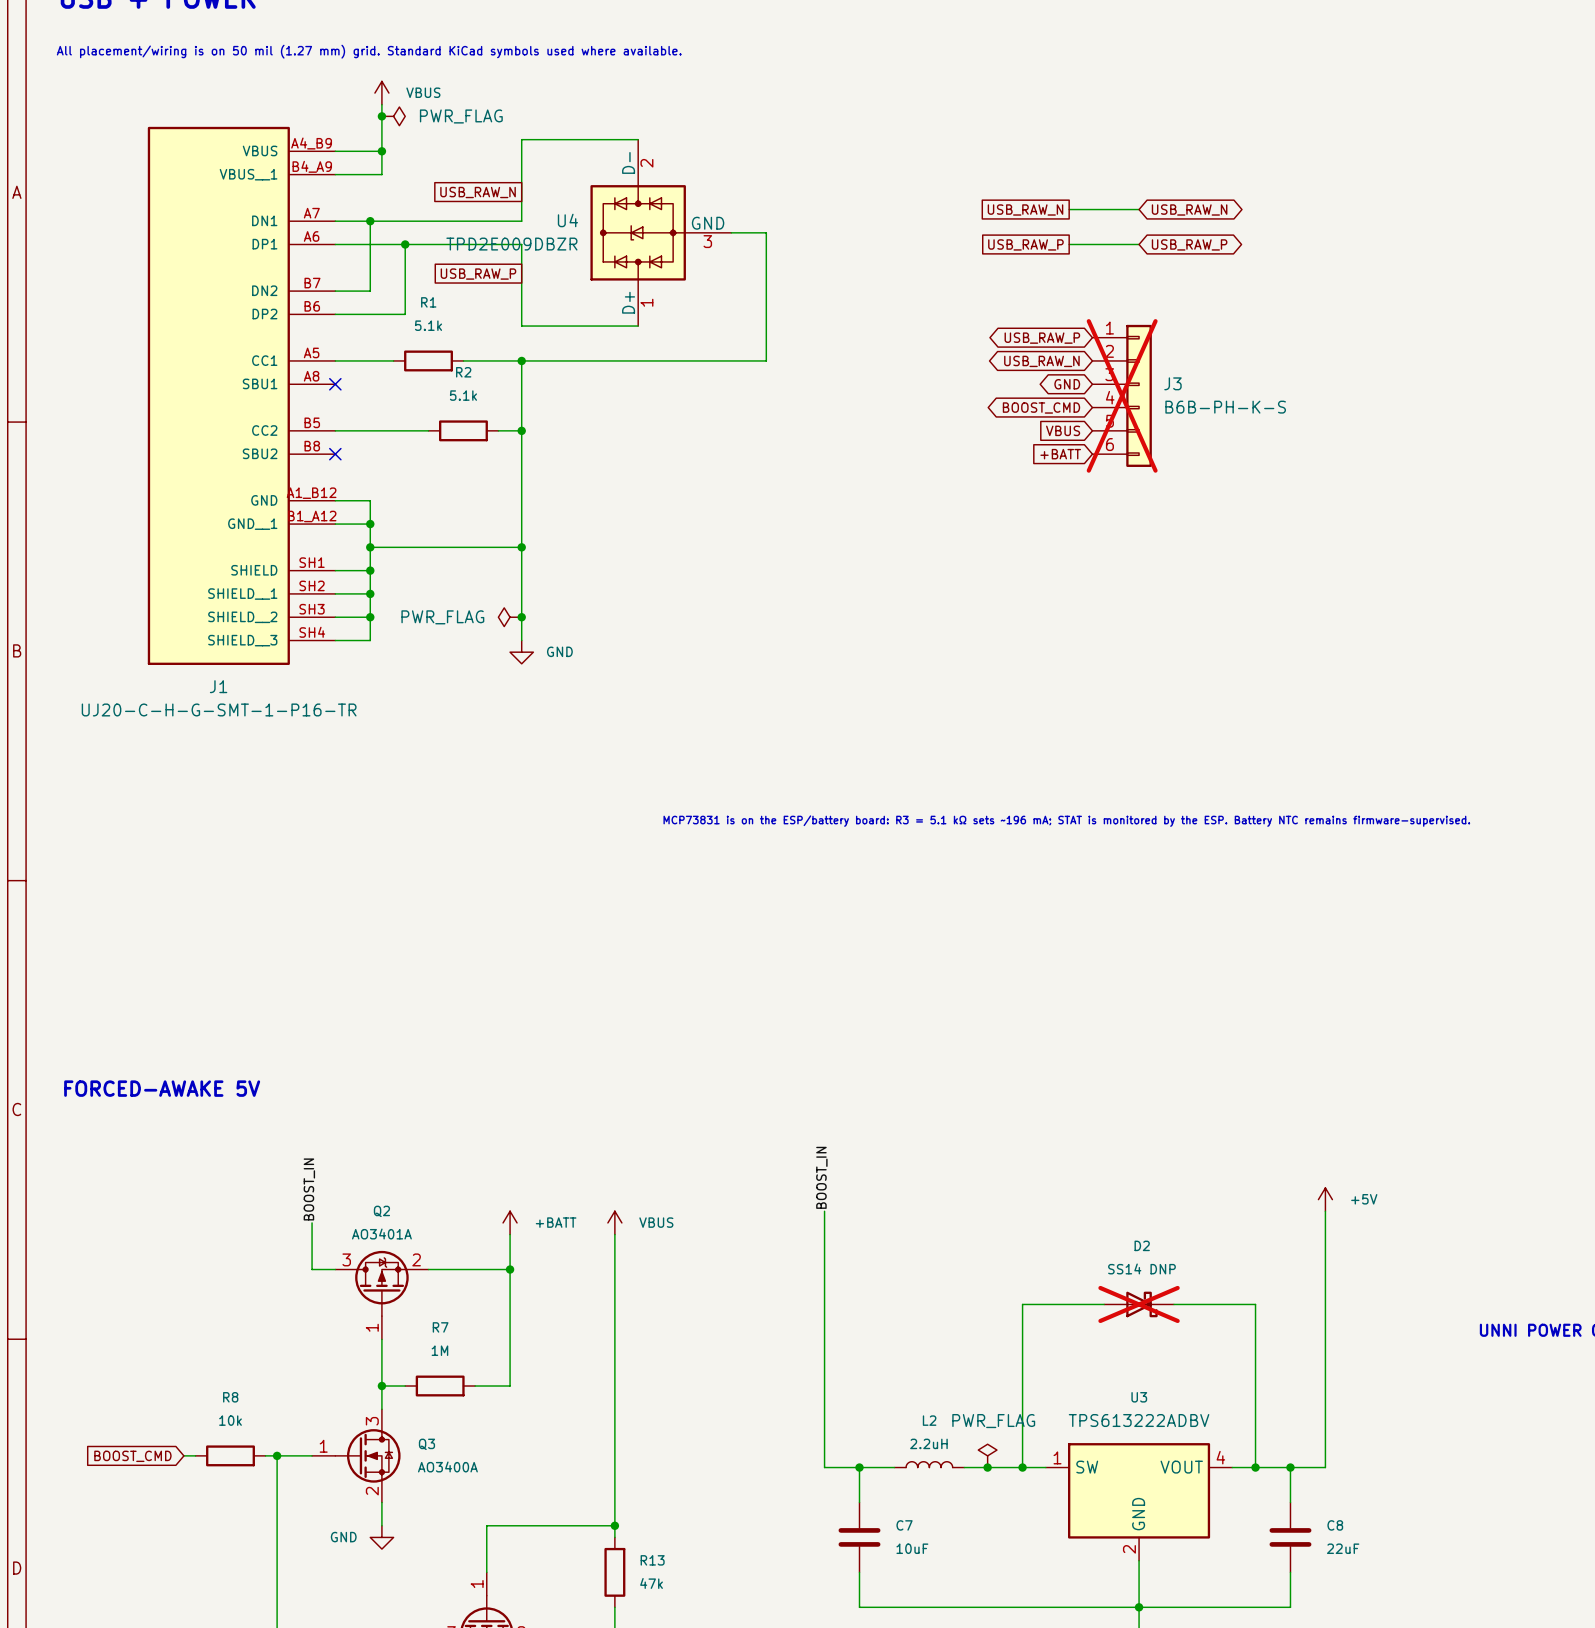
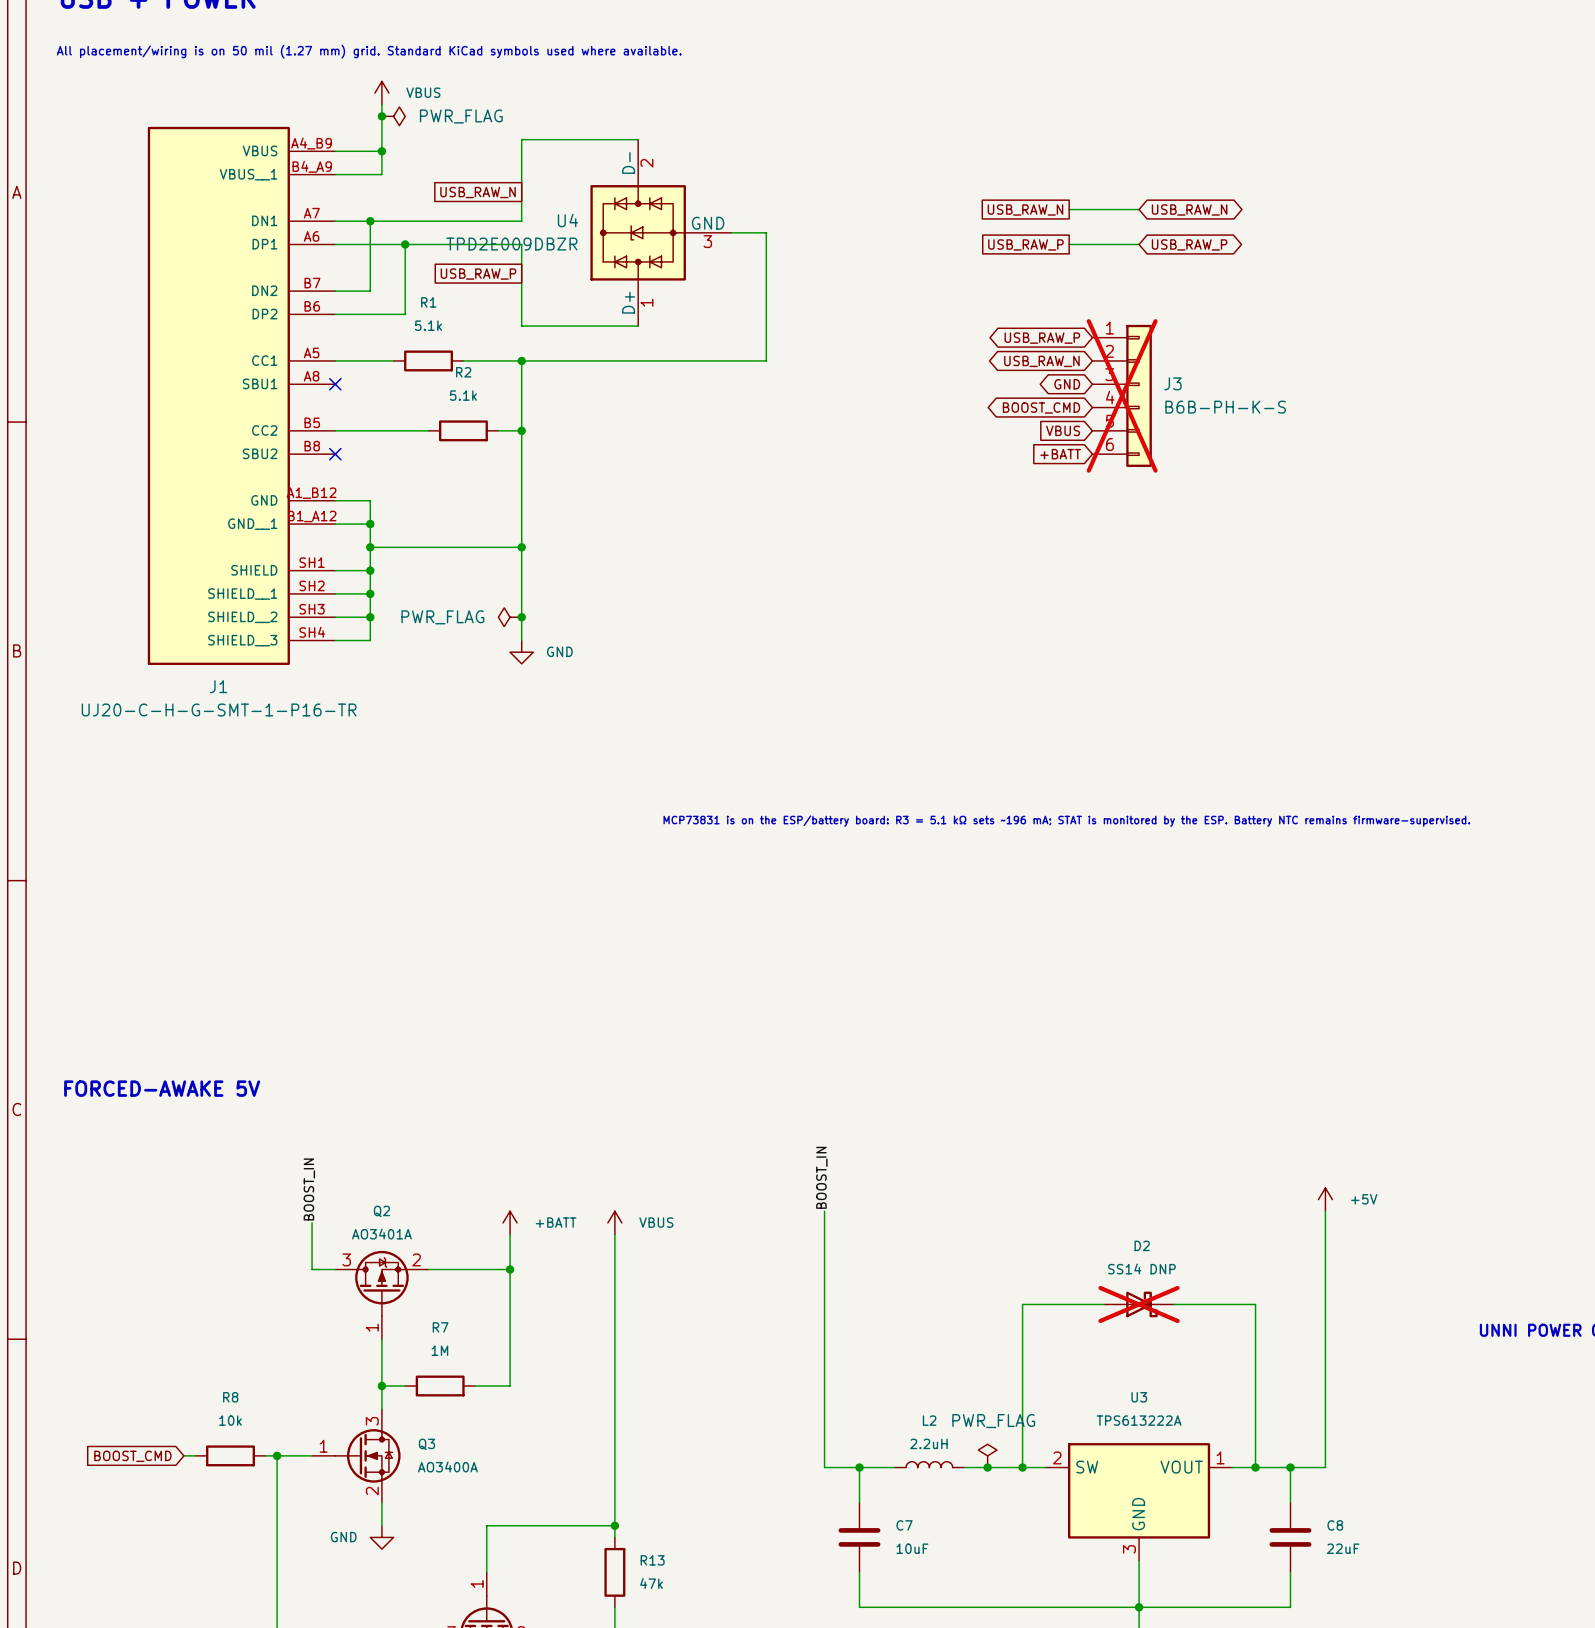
U3 value: TPS613222ADBV (1139, 1420) -> TPS613222A (1139, 1420)
U3 pin number: 1 (1057, 1457) -> 2 (1057, 1457)
U3 pin number: 4 (1220, 1457) -> 1 (1220, 1457)
U3 pin number: 2 (1129, 1549) -> 3 (1129, 1549)

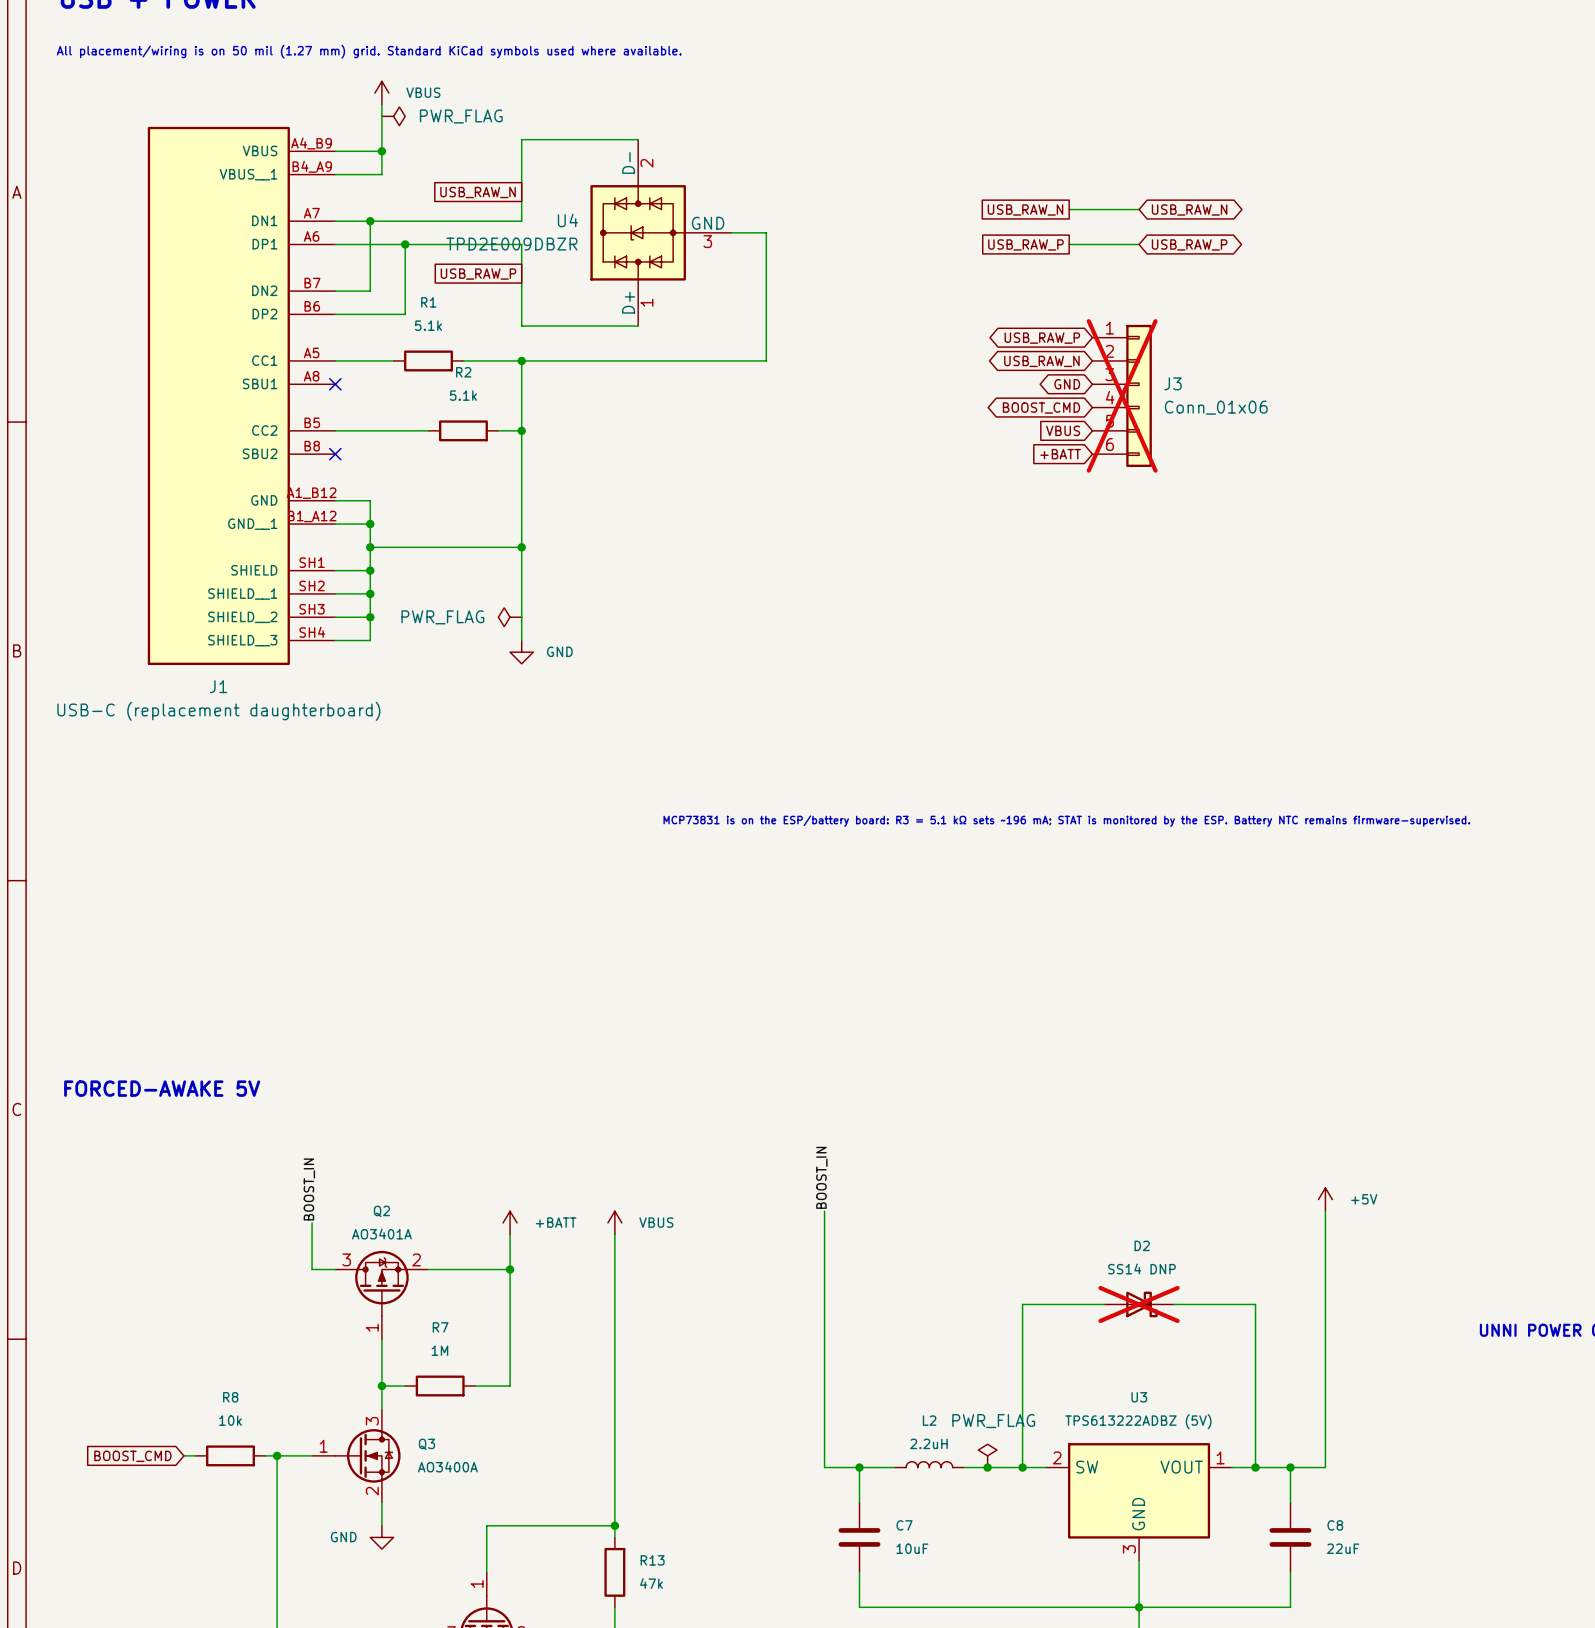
junction: (381, 116) -> none
J3 value: B6B-PH-K-S (1225, 407) -> Conn_01x06 (1216, 407)
junction: (521, 617) -> none
J1 value: UJ20-C-H-G-SMT-1-P16-TR (219, 709) -> USB-C (replacement daughterboard) (218, 711)
U3 value: TPS613222A (1139, 1420) -> TPS613222ADBZ (5V) (1138, 1421)

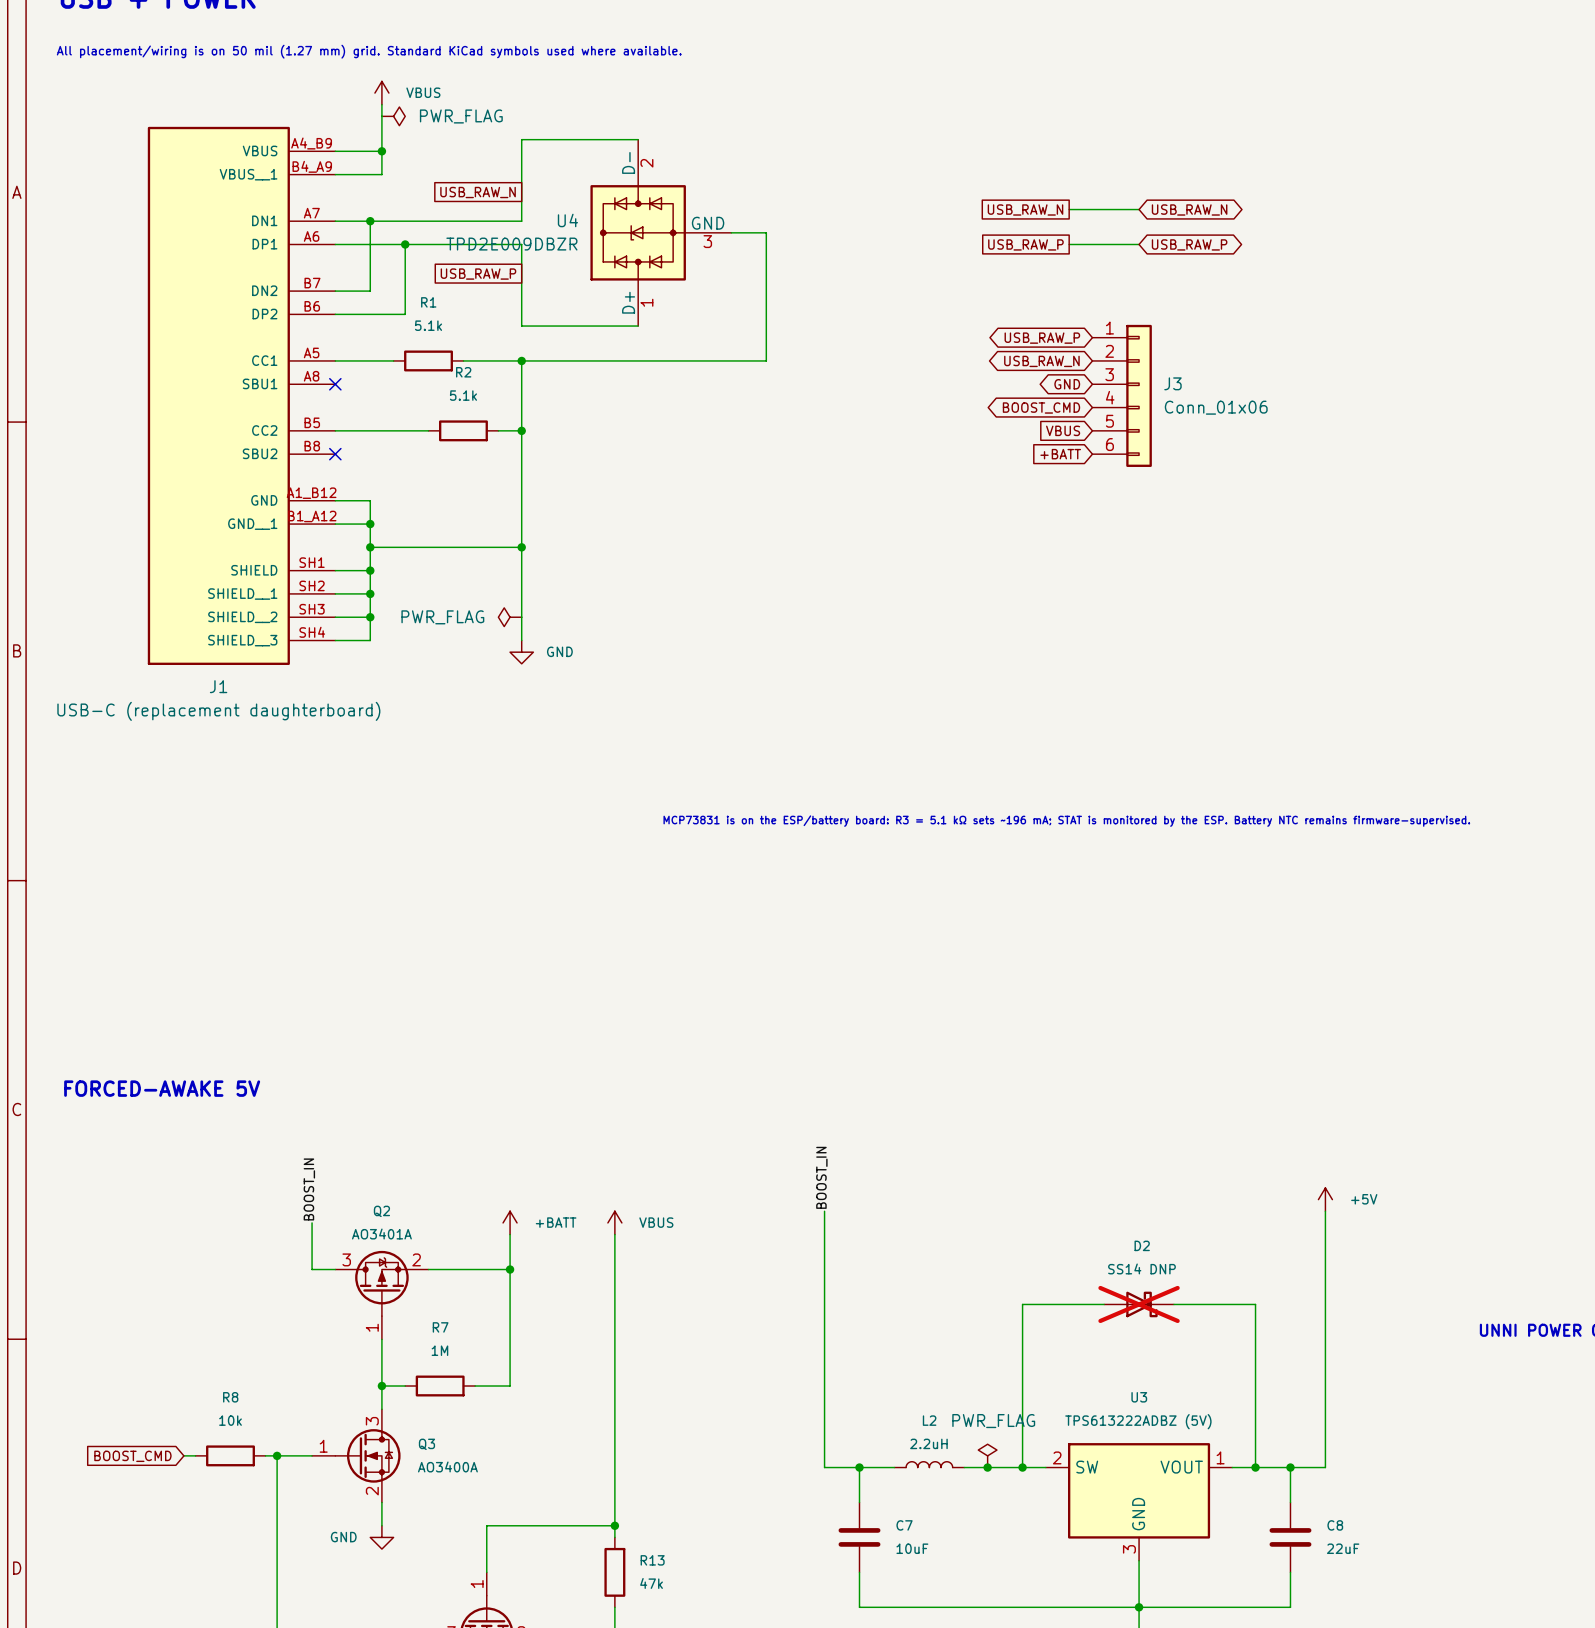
J3 do-not-place cross: (1122, 395) -> none

